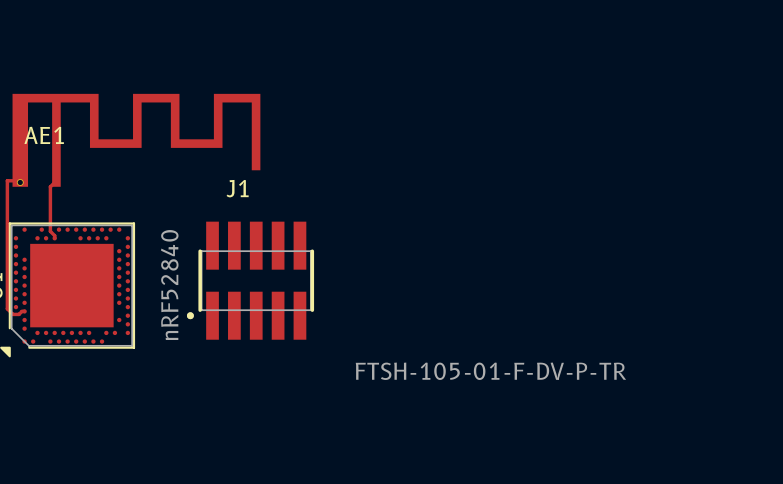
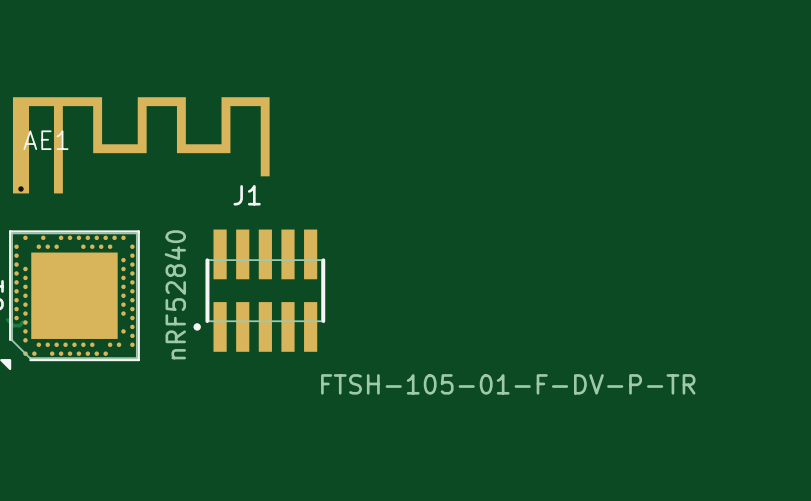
track: (20, 180) (7, 180) (7, 308) -> none
track: (56, 180) (50, 186) (50, 231) (54, 238) -> none

